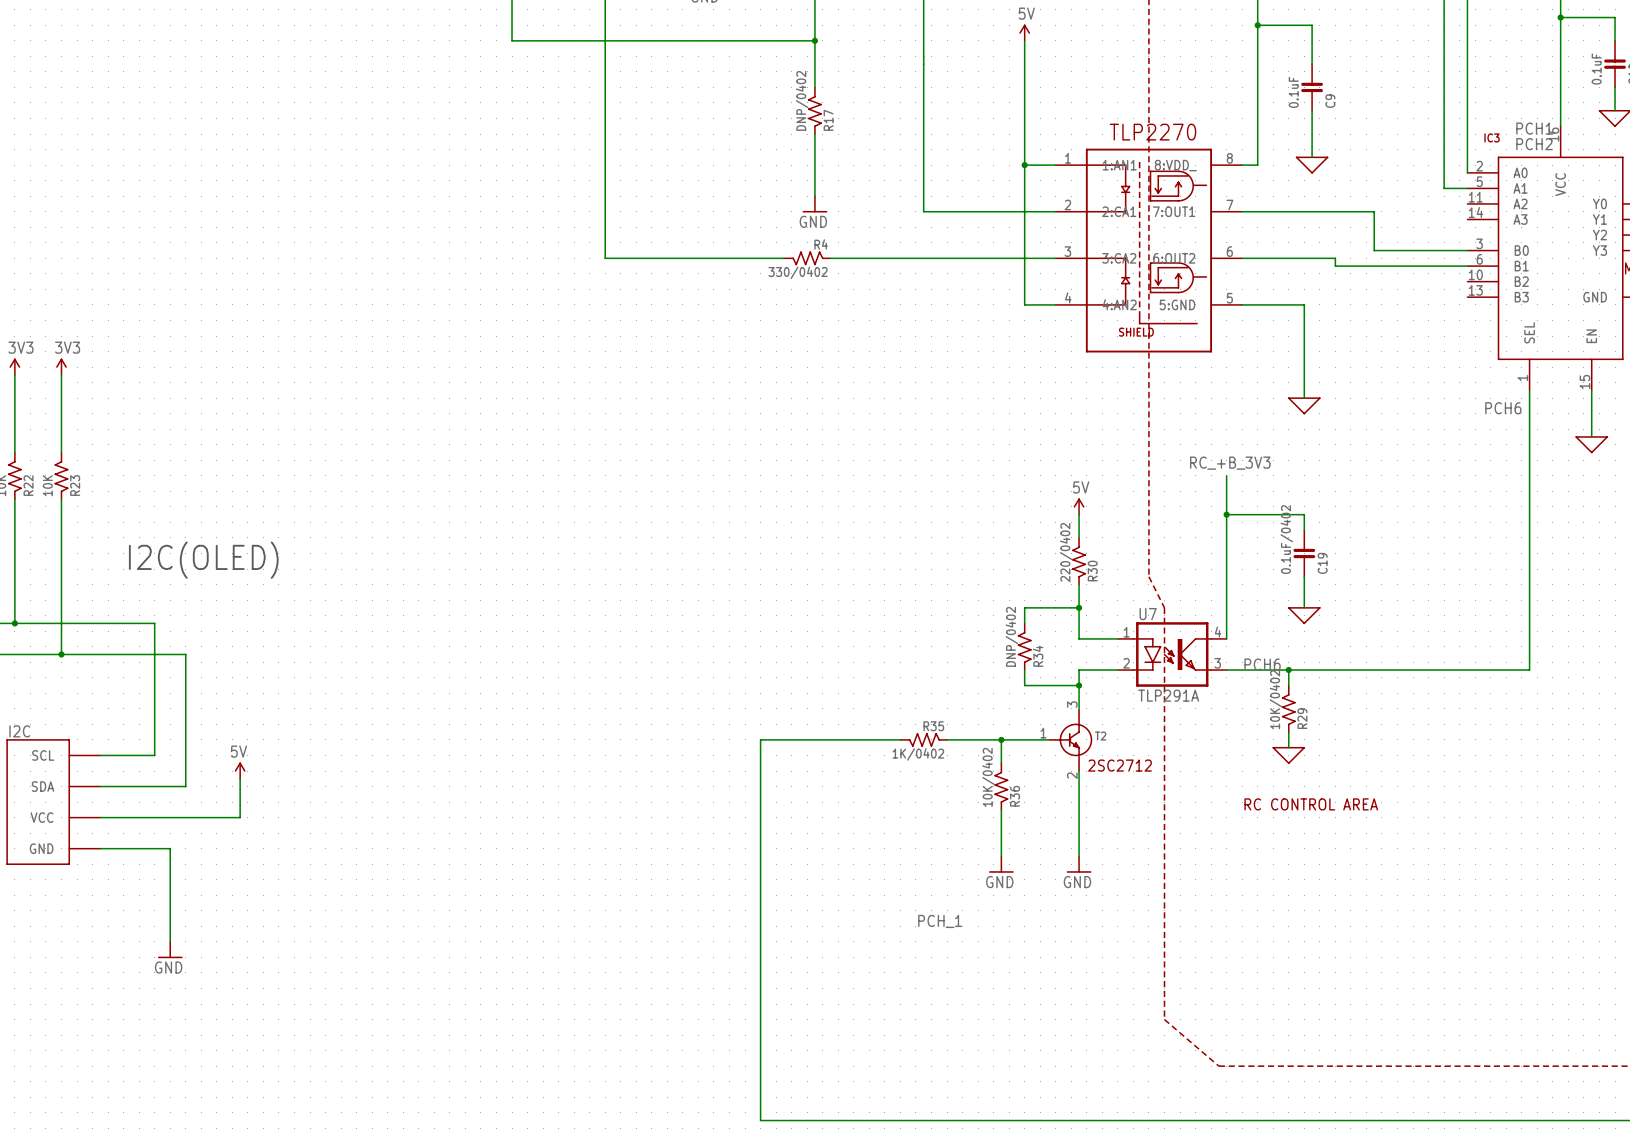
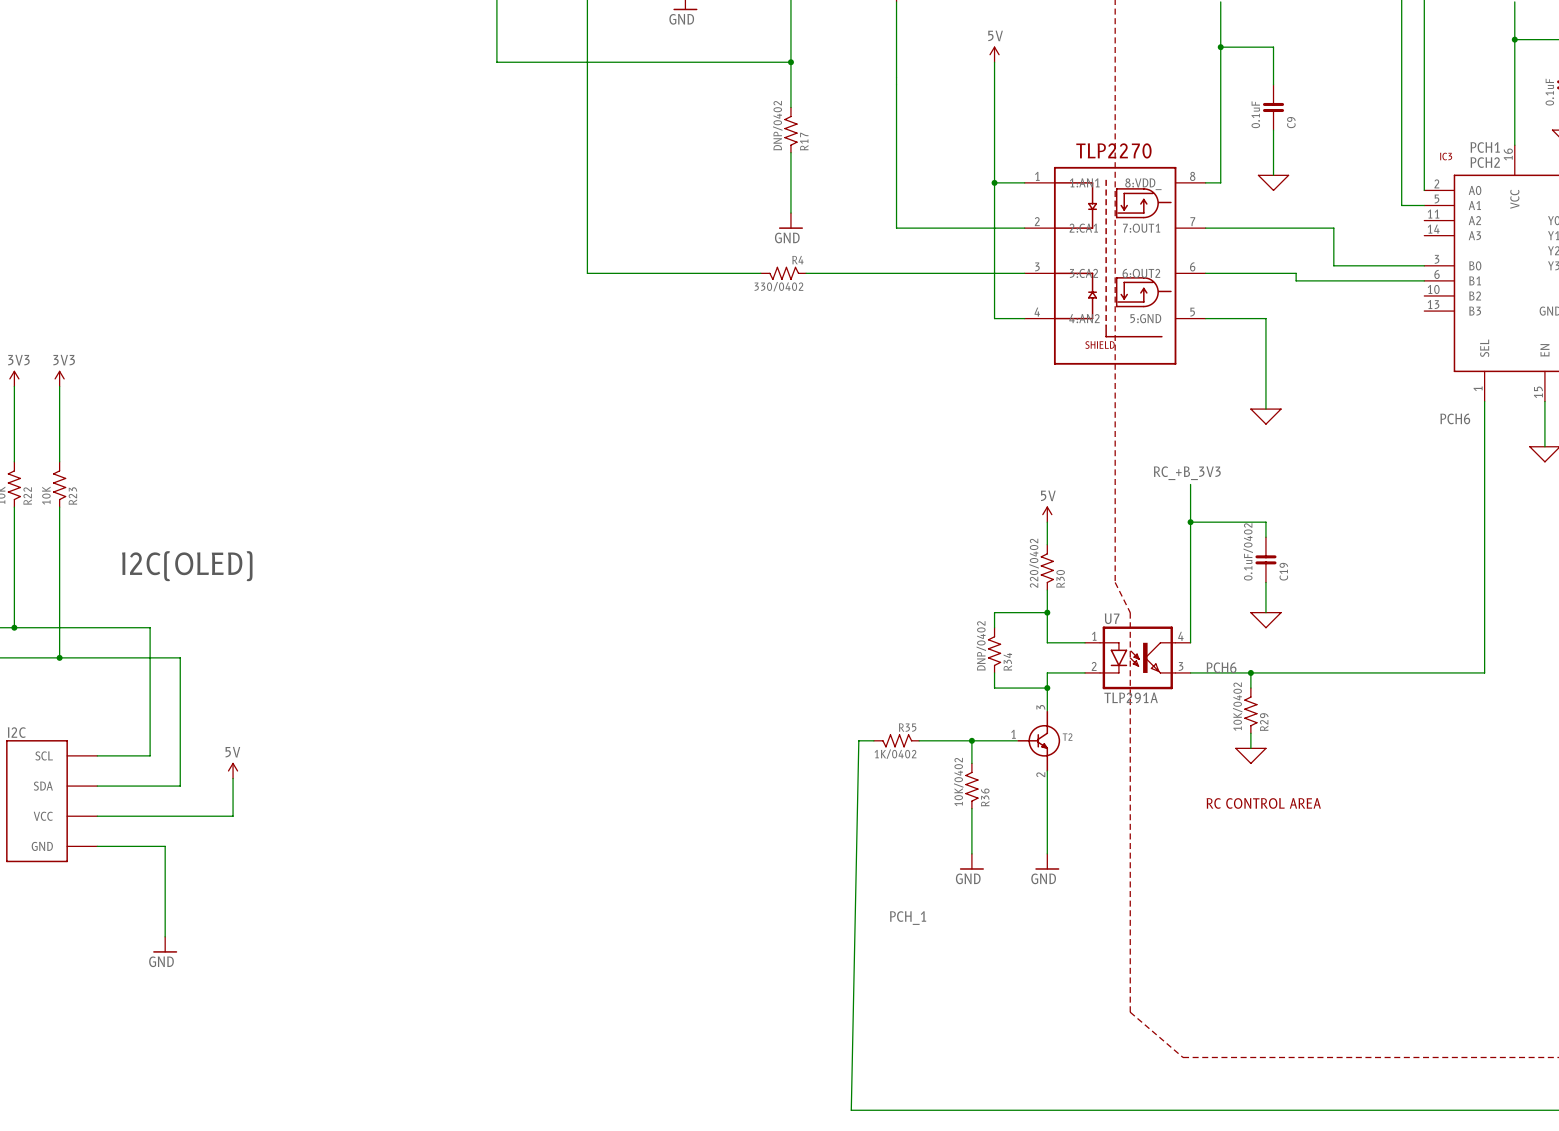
wire: (884, 739) (760, 739) (760, 1120) (877, 1120) -> (858, 740) (851, 1110)
text: 2SC2712 (1120, 765) -> none

